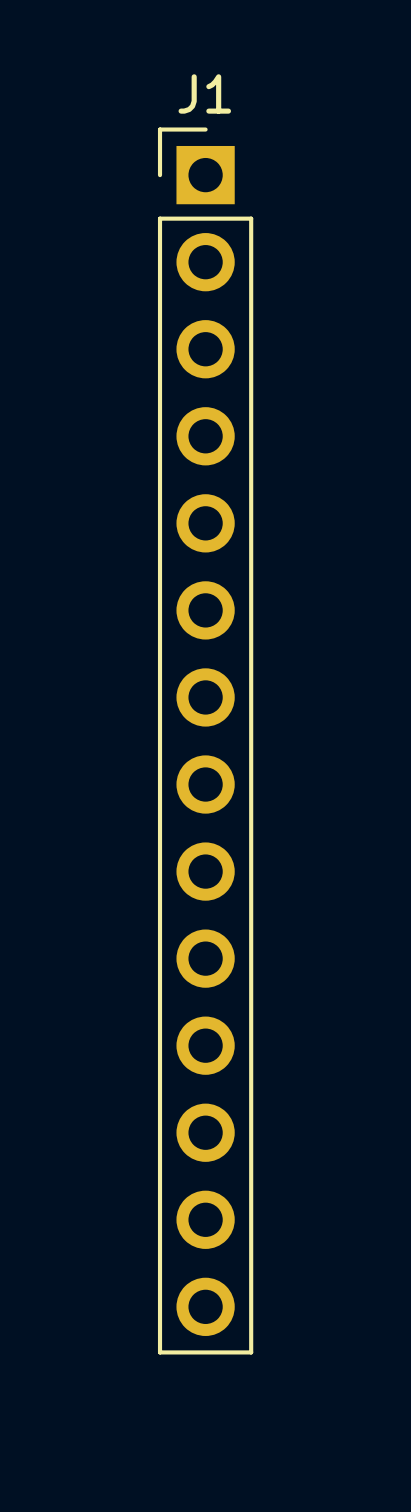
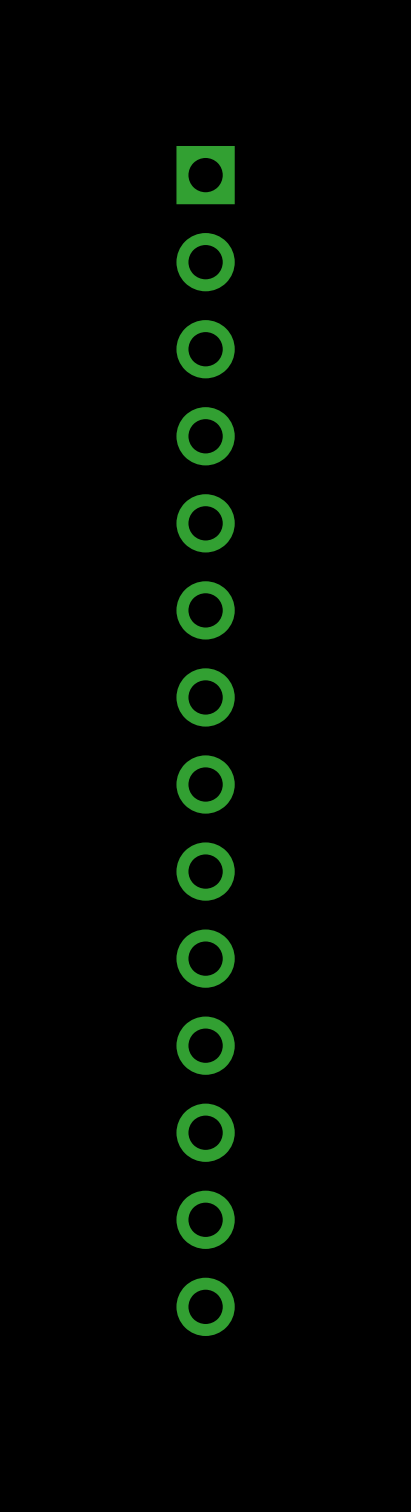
J1 side: bottom (205, 740) -> top (205, 740)

